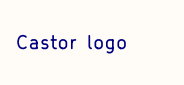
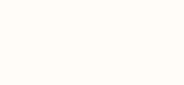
text: Castor logo (71, 44) -> none

